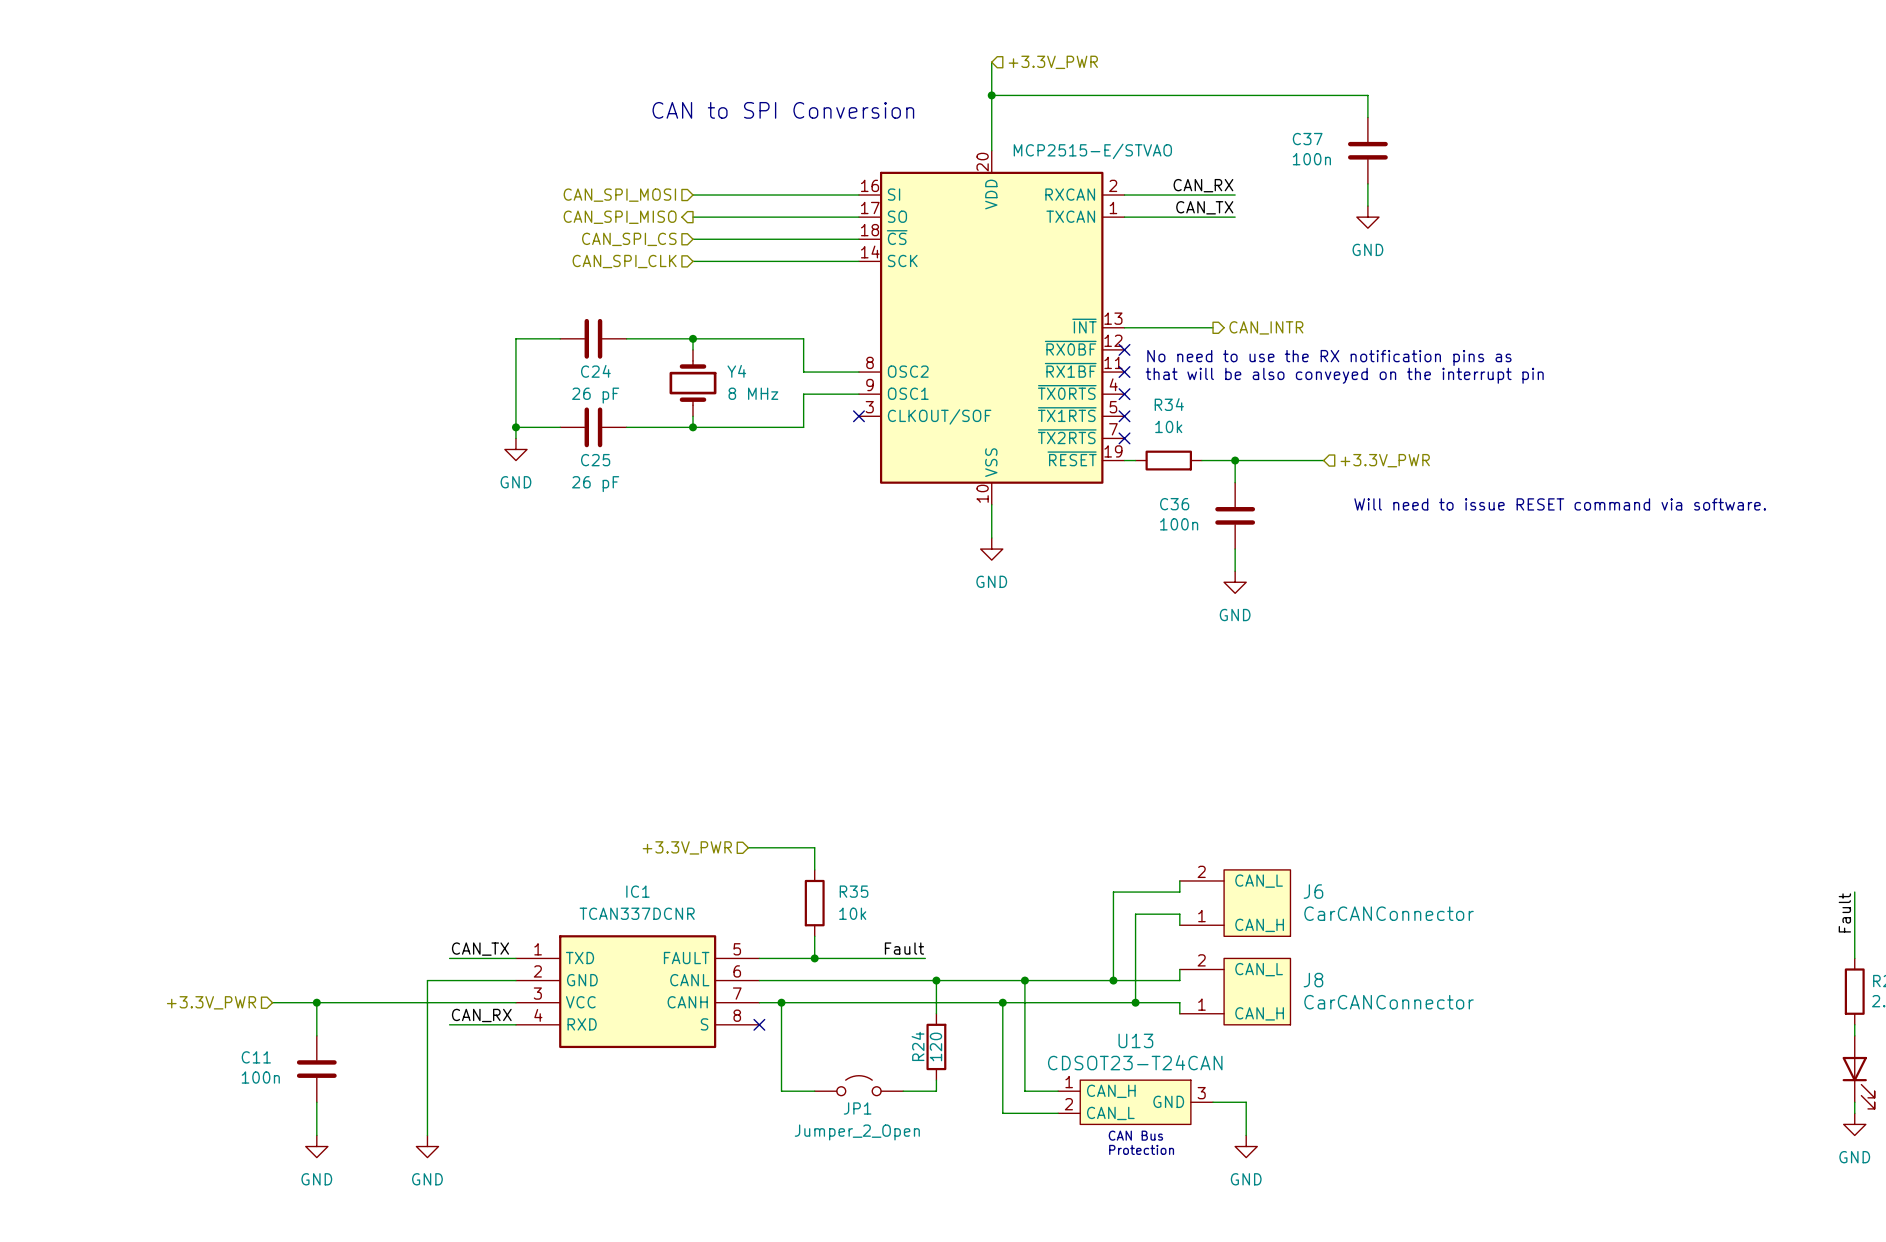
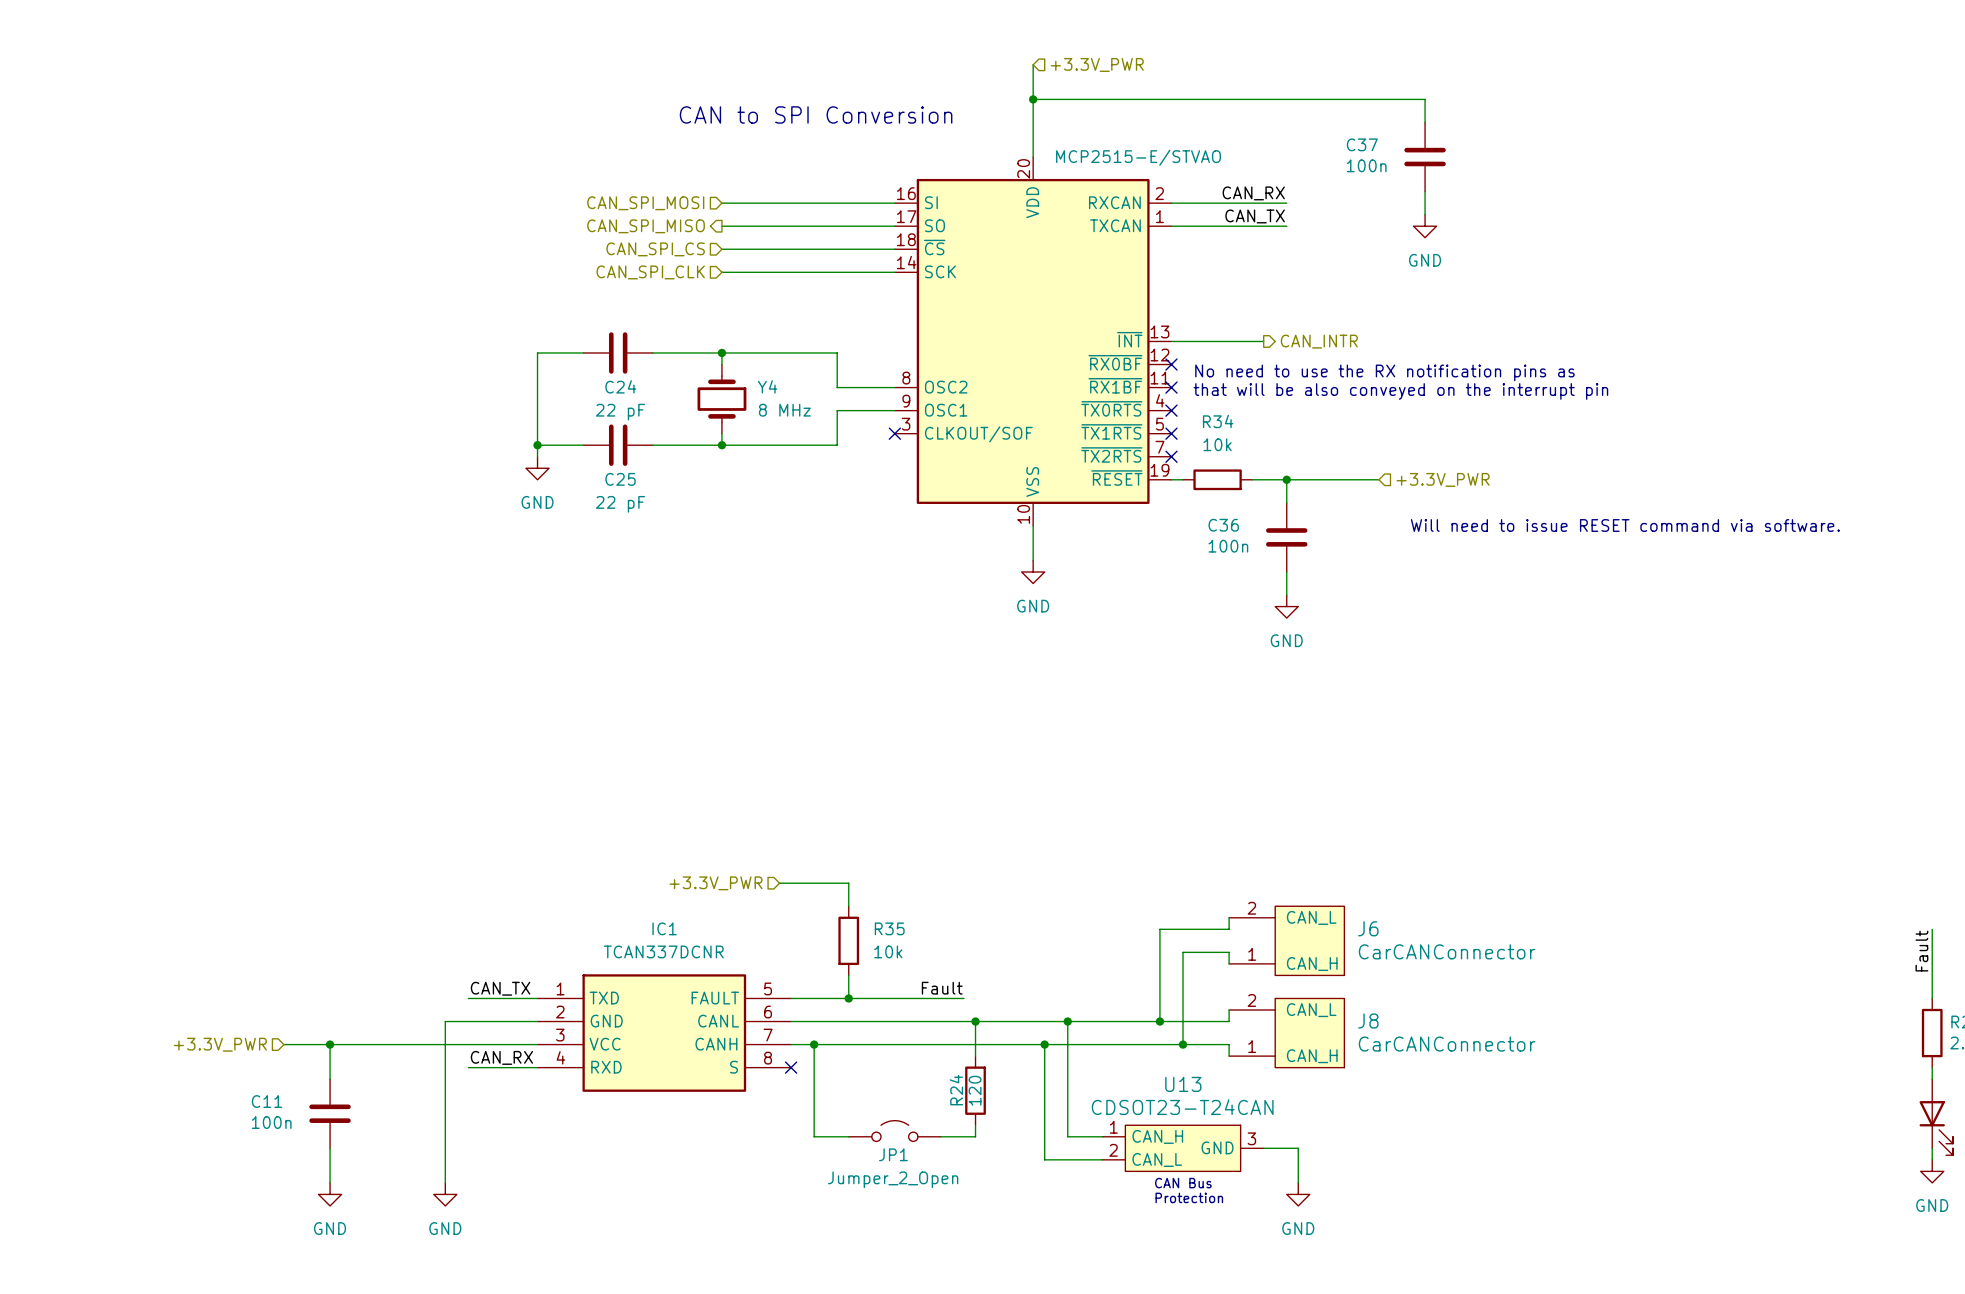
C24 value: 26 pF (595, 395) -> 22 pF (620, 412)
C25 value: 26 pF (595, 484) -> 22 pF (620, 504)

